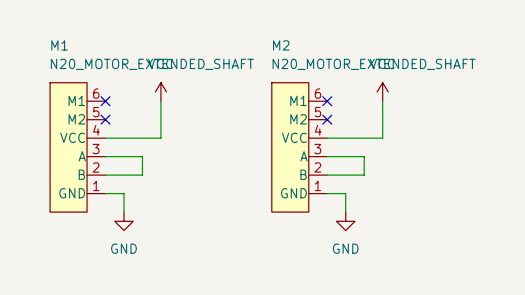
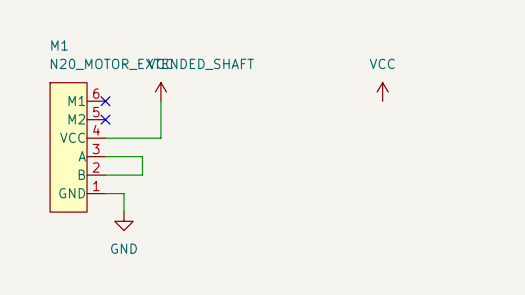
no-connect mark: (327, 101) -> none
wire: (382, 101) (382, 138) (327, 138) -> none
no-connect mark: (327, 119) -> none
M2: N20_MOTOR_EXTENDED_SHAFT (299, 147) -> none
wire: (327, 156) (364, 156) (364, 175) (327, 175) -> none
wire: (327, 193) (345, 193) (345, 212) -> none
power symbol: GND (345, 221) -> none

